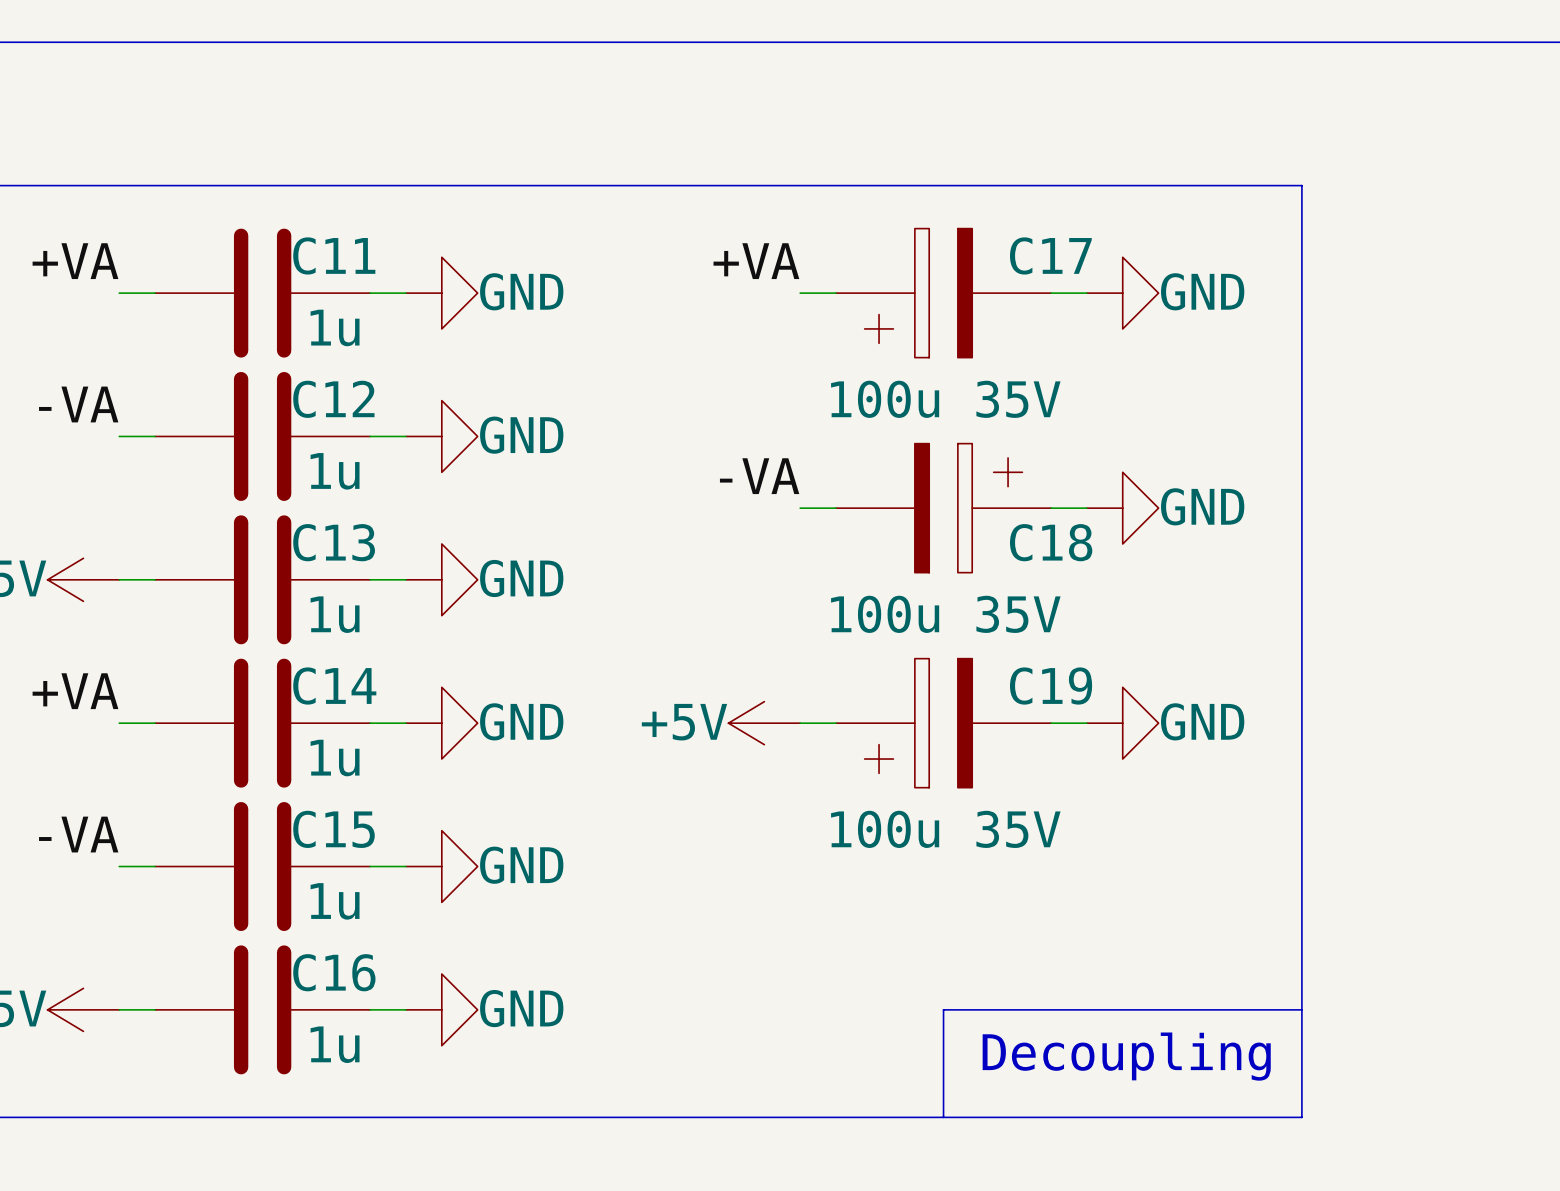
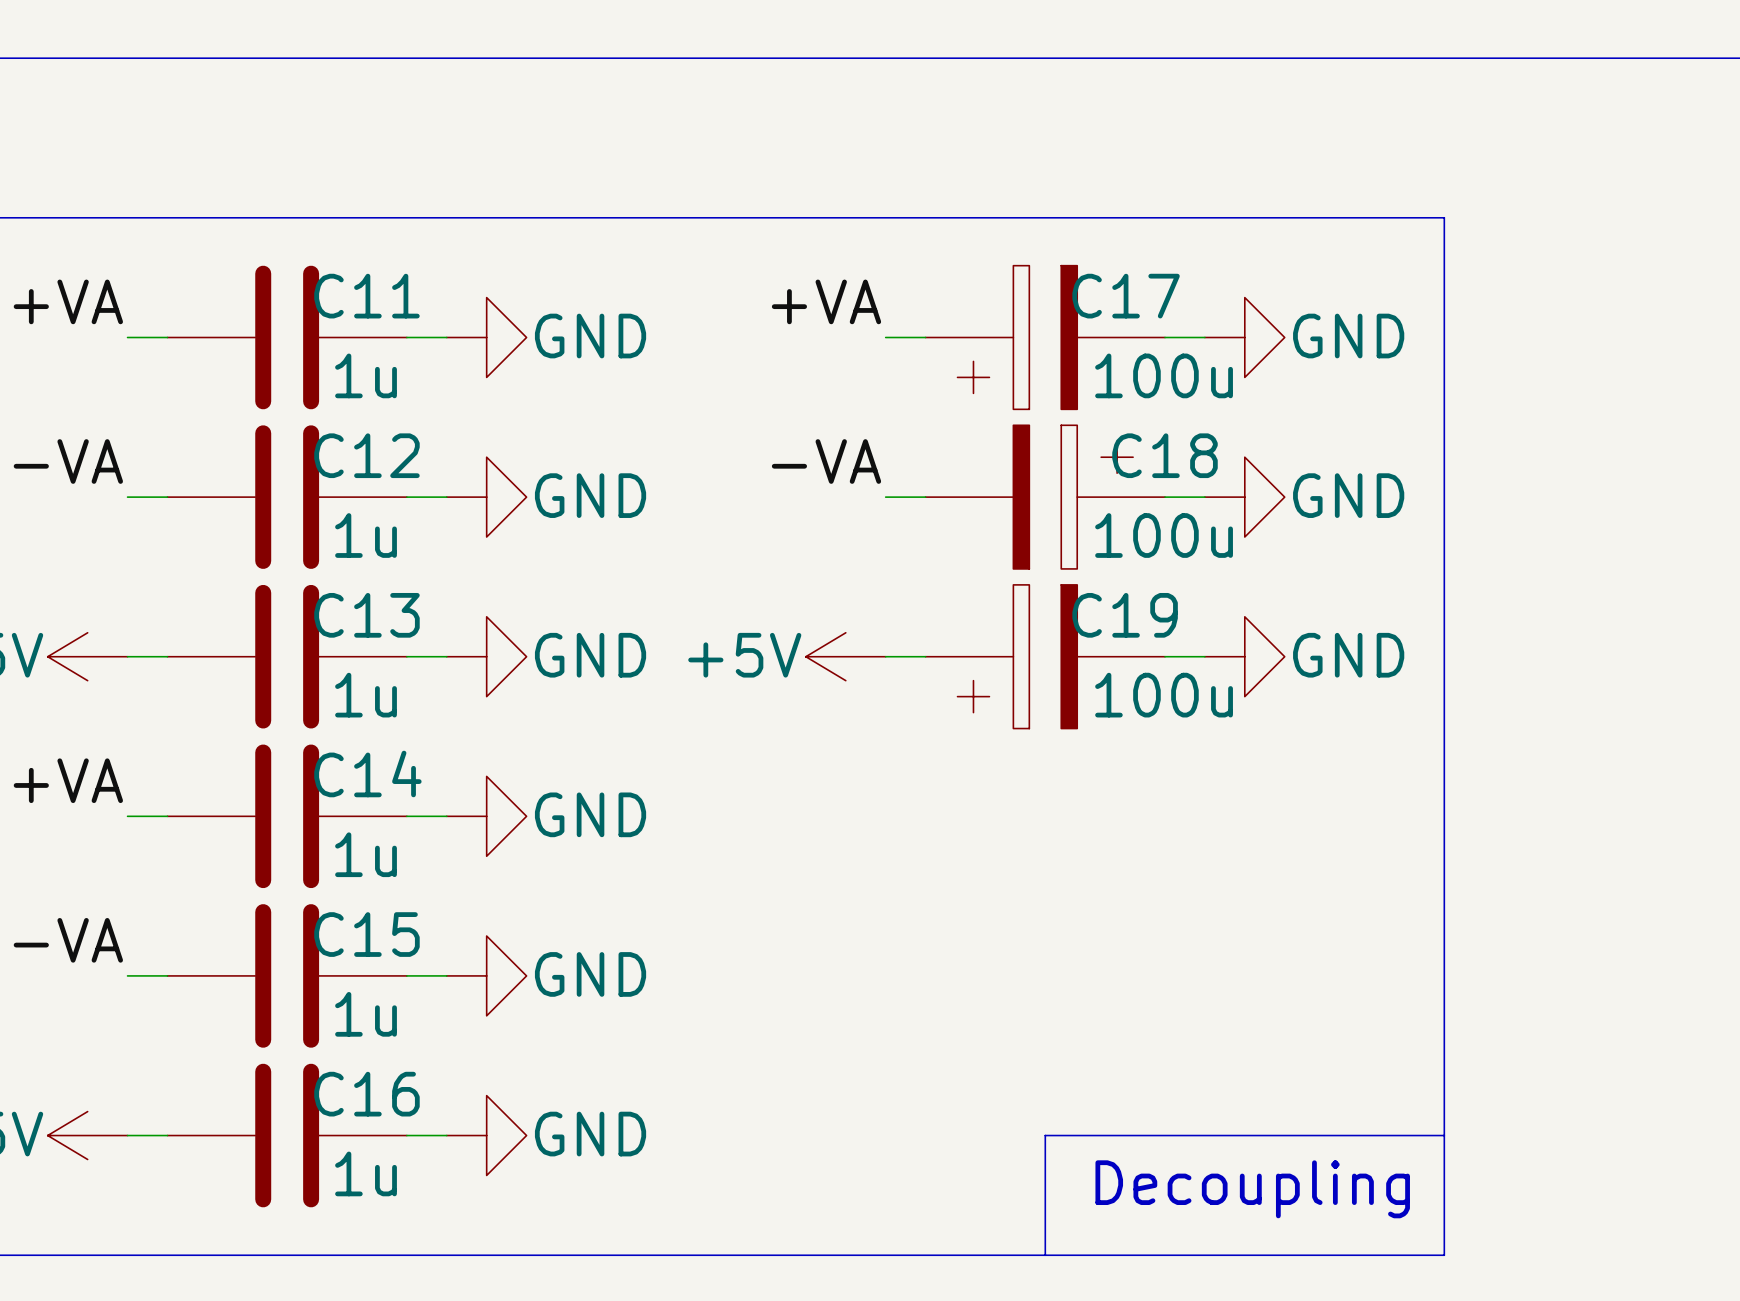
C17 name position: C17 (1050, 255) -> C17 (1126, 296)
C17 value: 100u 35V (945, 399) -> 100u (1164, 375)
power symbol: none -> GND (1244, 497)
label position: -VA (759, 476) -> -VA (826, 461)
wire: (800, 508) (836, 508) -> (885, 656) (925, 656)
C18 position: (943, 508) -> (1045, 497)
wire: (1051, 508) (1086, 508) -> (1165, 656) (1204, 656)
power symbol: GND (1122, 508) -> none
C18 name position: C18 (1051, 542) -> C18 (1165, 455)
power symbol: none -> GND (1244, 656)
C18 value: 100u 35V (945, 614) -> 100u (1164, 535)
C19 name position: C19 (1051, 686) -> C19 (1125, 615)
power symbol position: +5V (764, 723) -> +5V (845, 656)
wire: (800, 723) (836, 723) -> (885, 497) (925, 497)
C19 position: (943, 723) -> (1045, 656)
wire: (1051, 723) (1086, 723) -> (1165, 497) (1204, 497)
power symbol: GND (1122, 723) -> none
C19 value: 100u 35V (945, 829) -> 100u (1164, 695)

